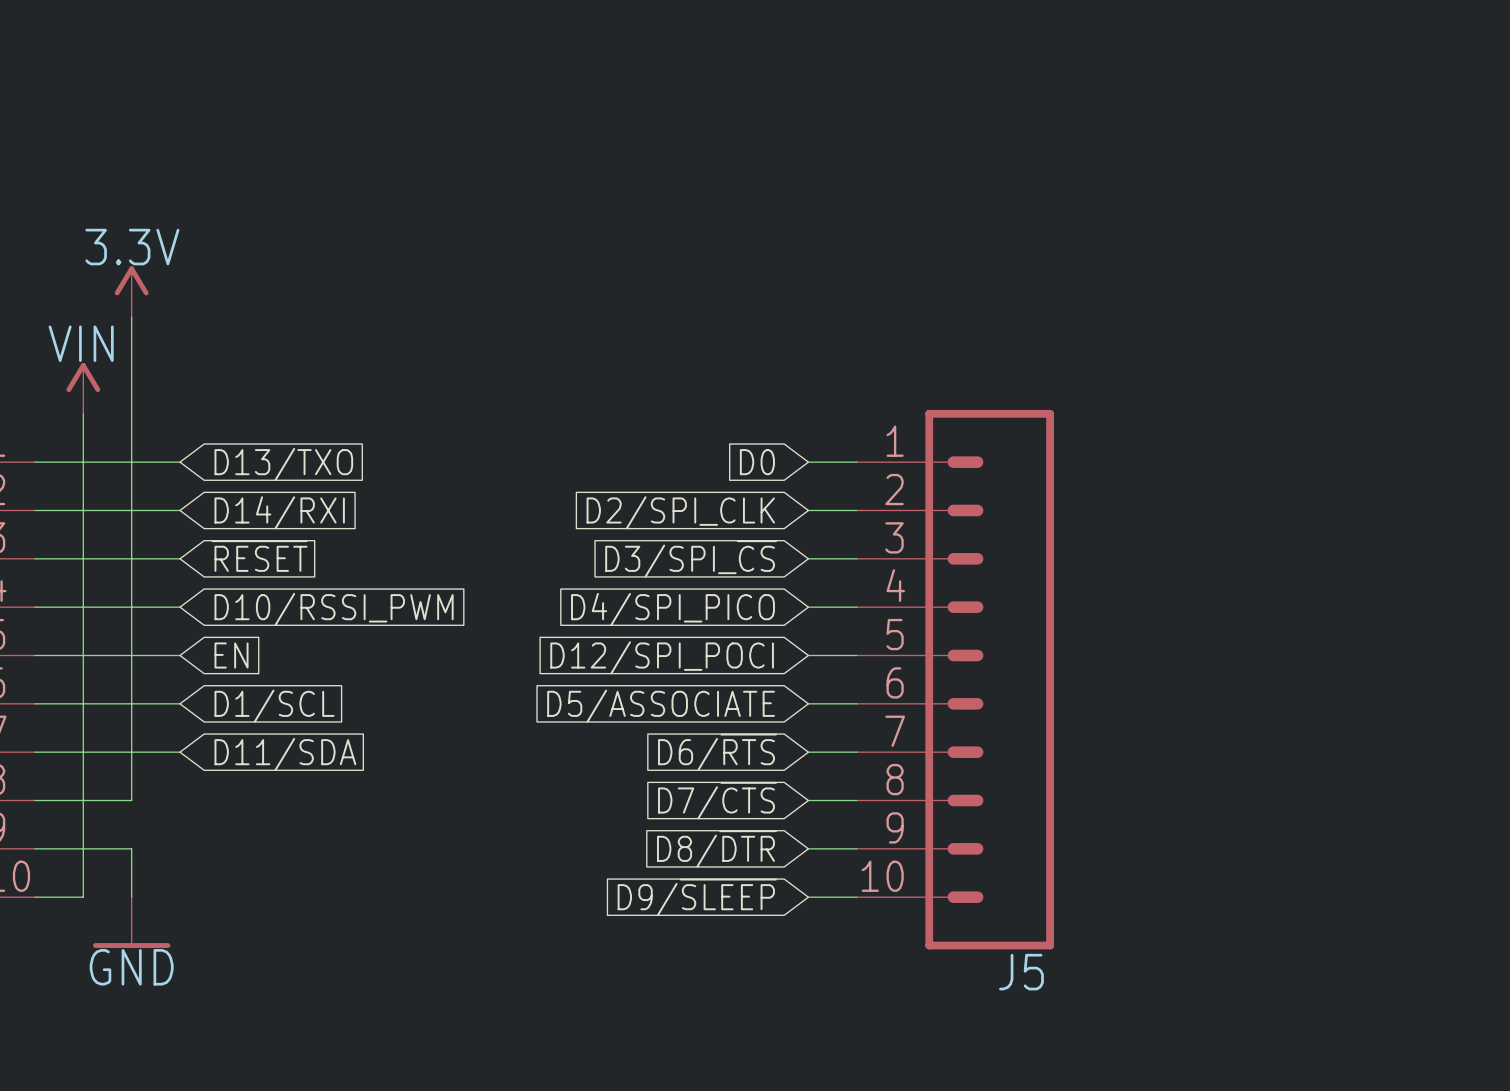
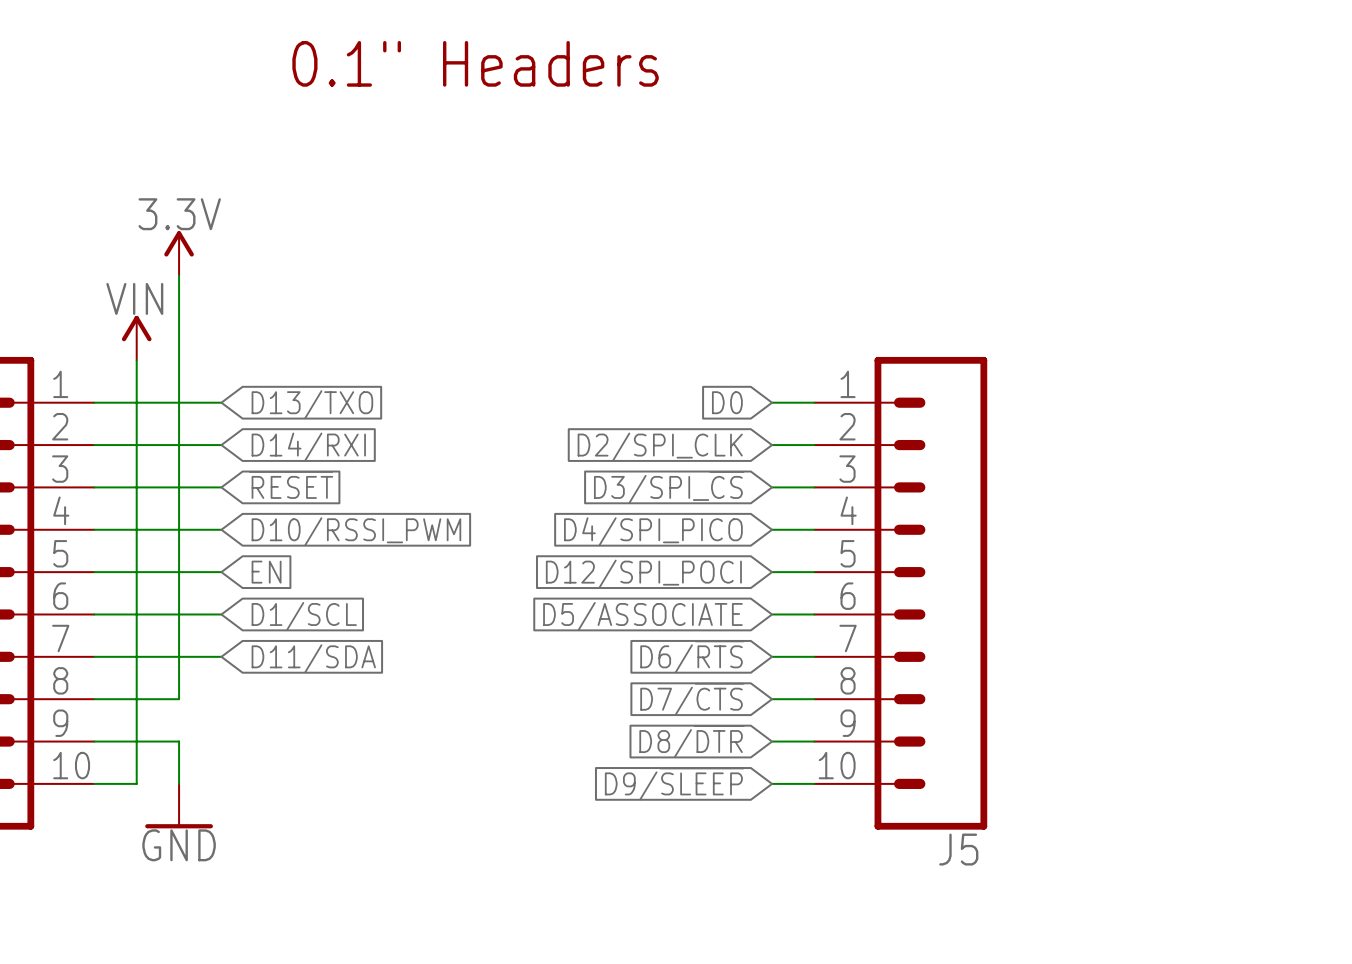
text: none -> 0.1" Headers (475, 63)

